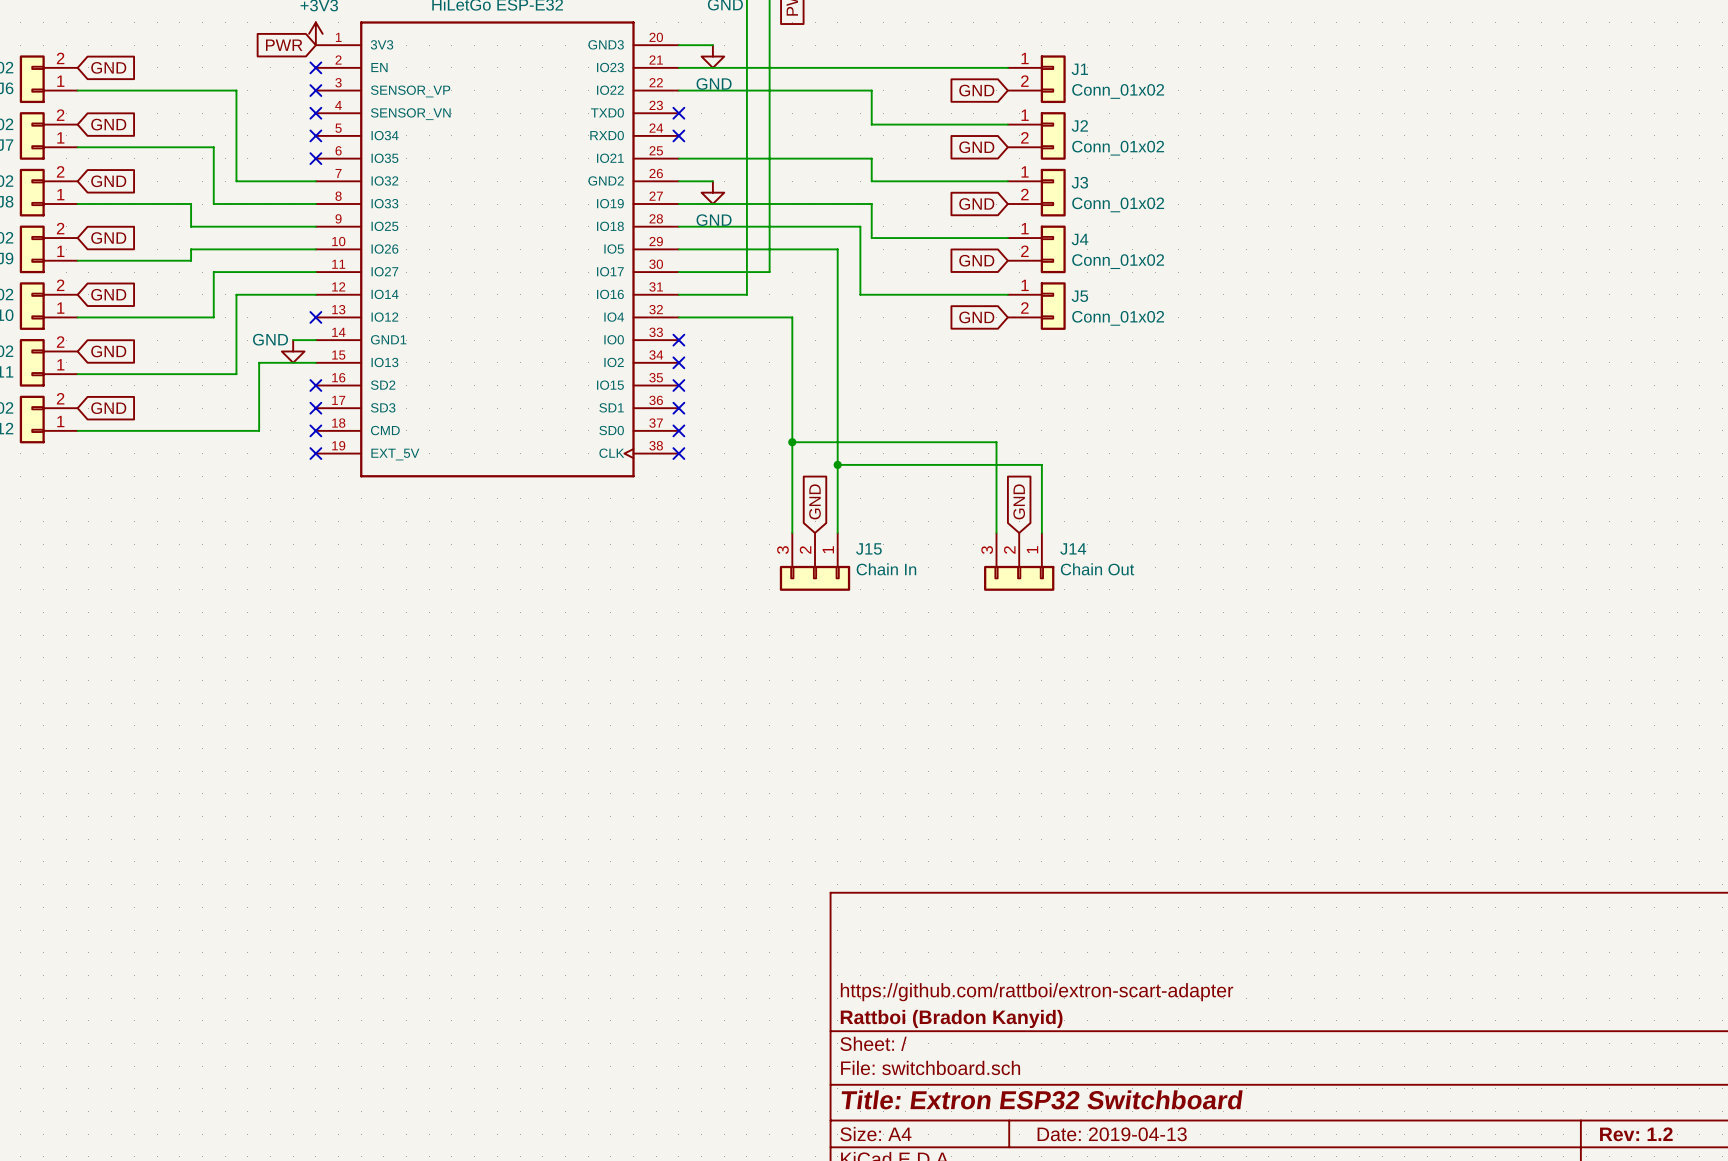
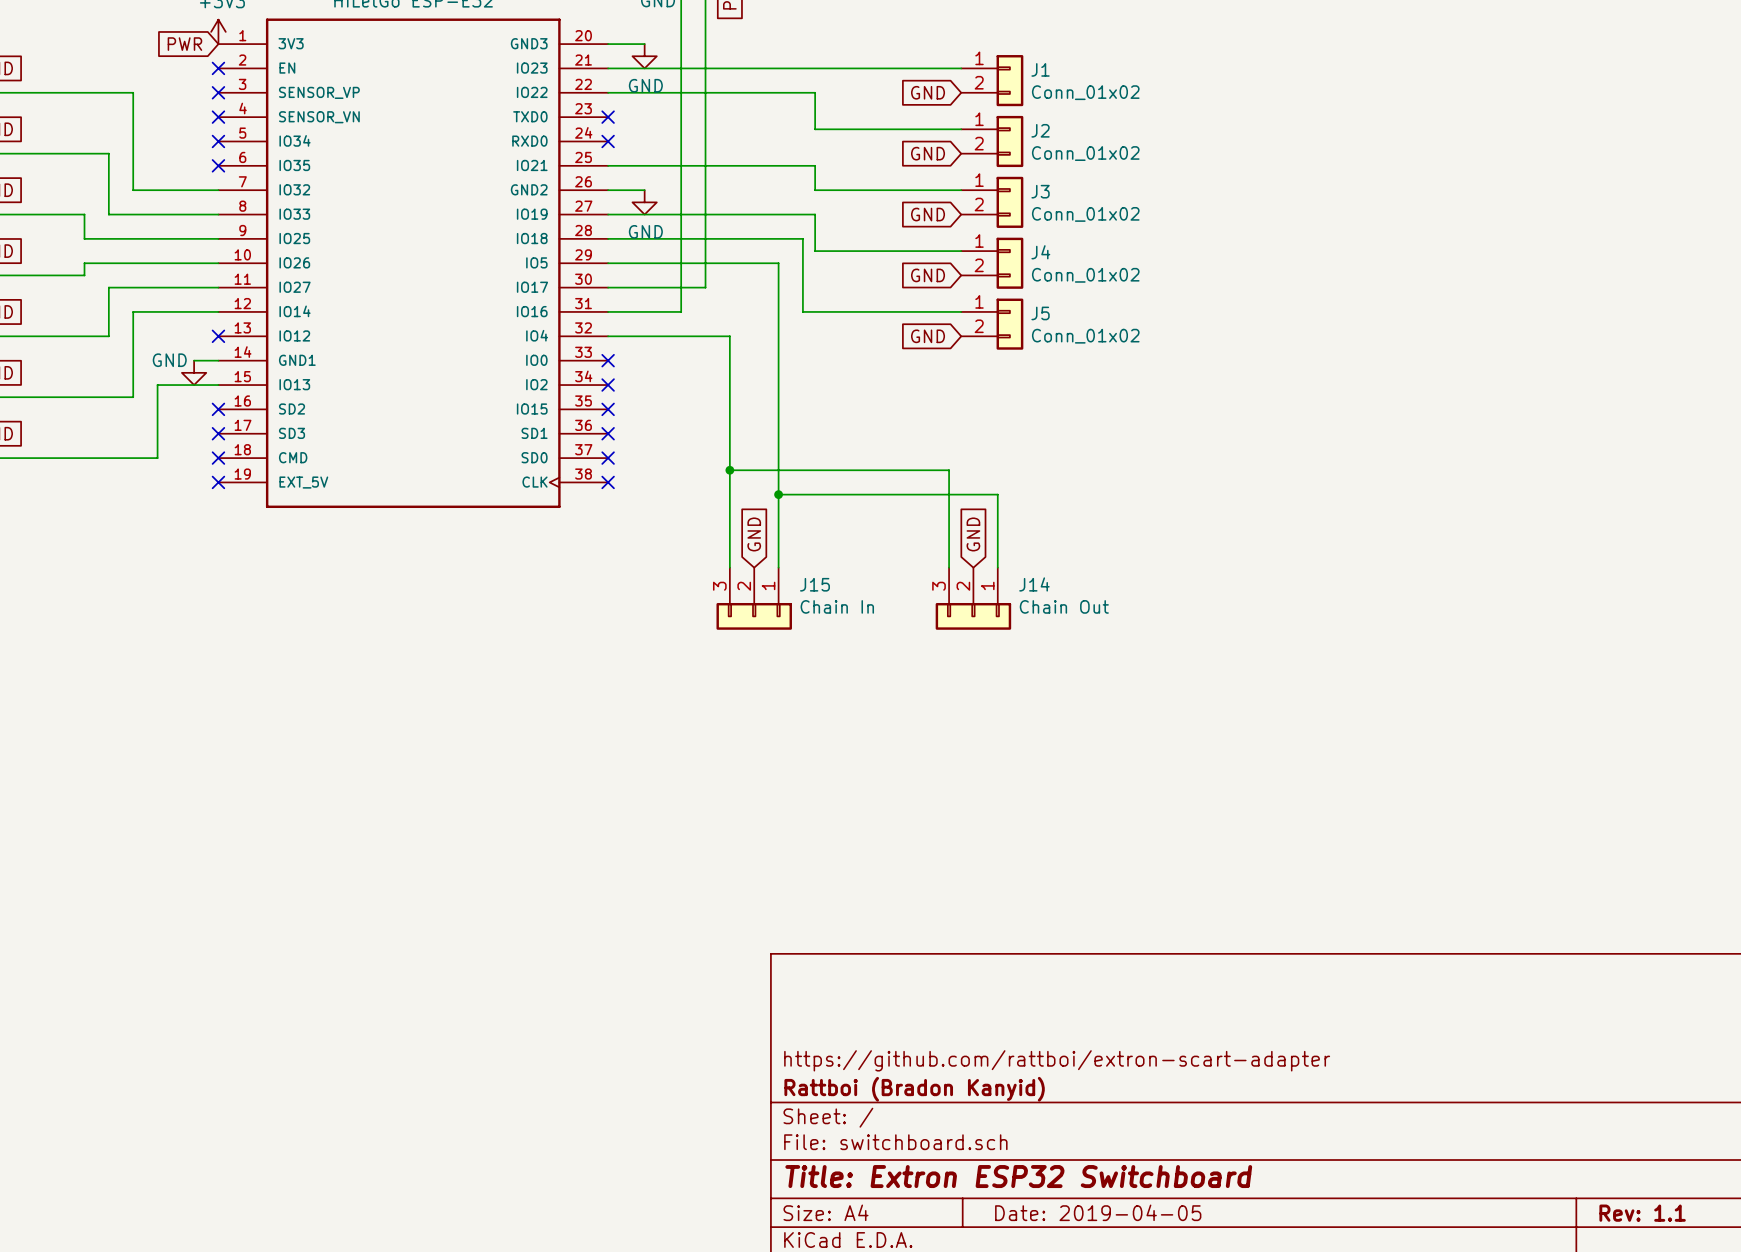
title block: Date: 2019-04-13 (1112, 1134) -> Date: 2019-04-05 (1098, 1212)
title block: Rev: 1.2 (1636, 1134) -> Rev: 1.1 (1642, 1213)

